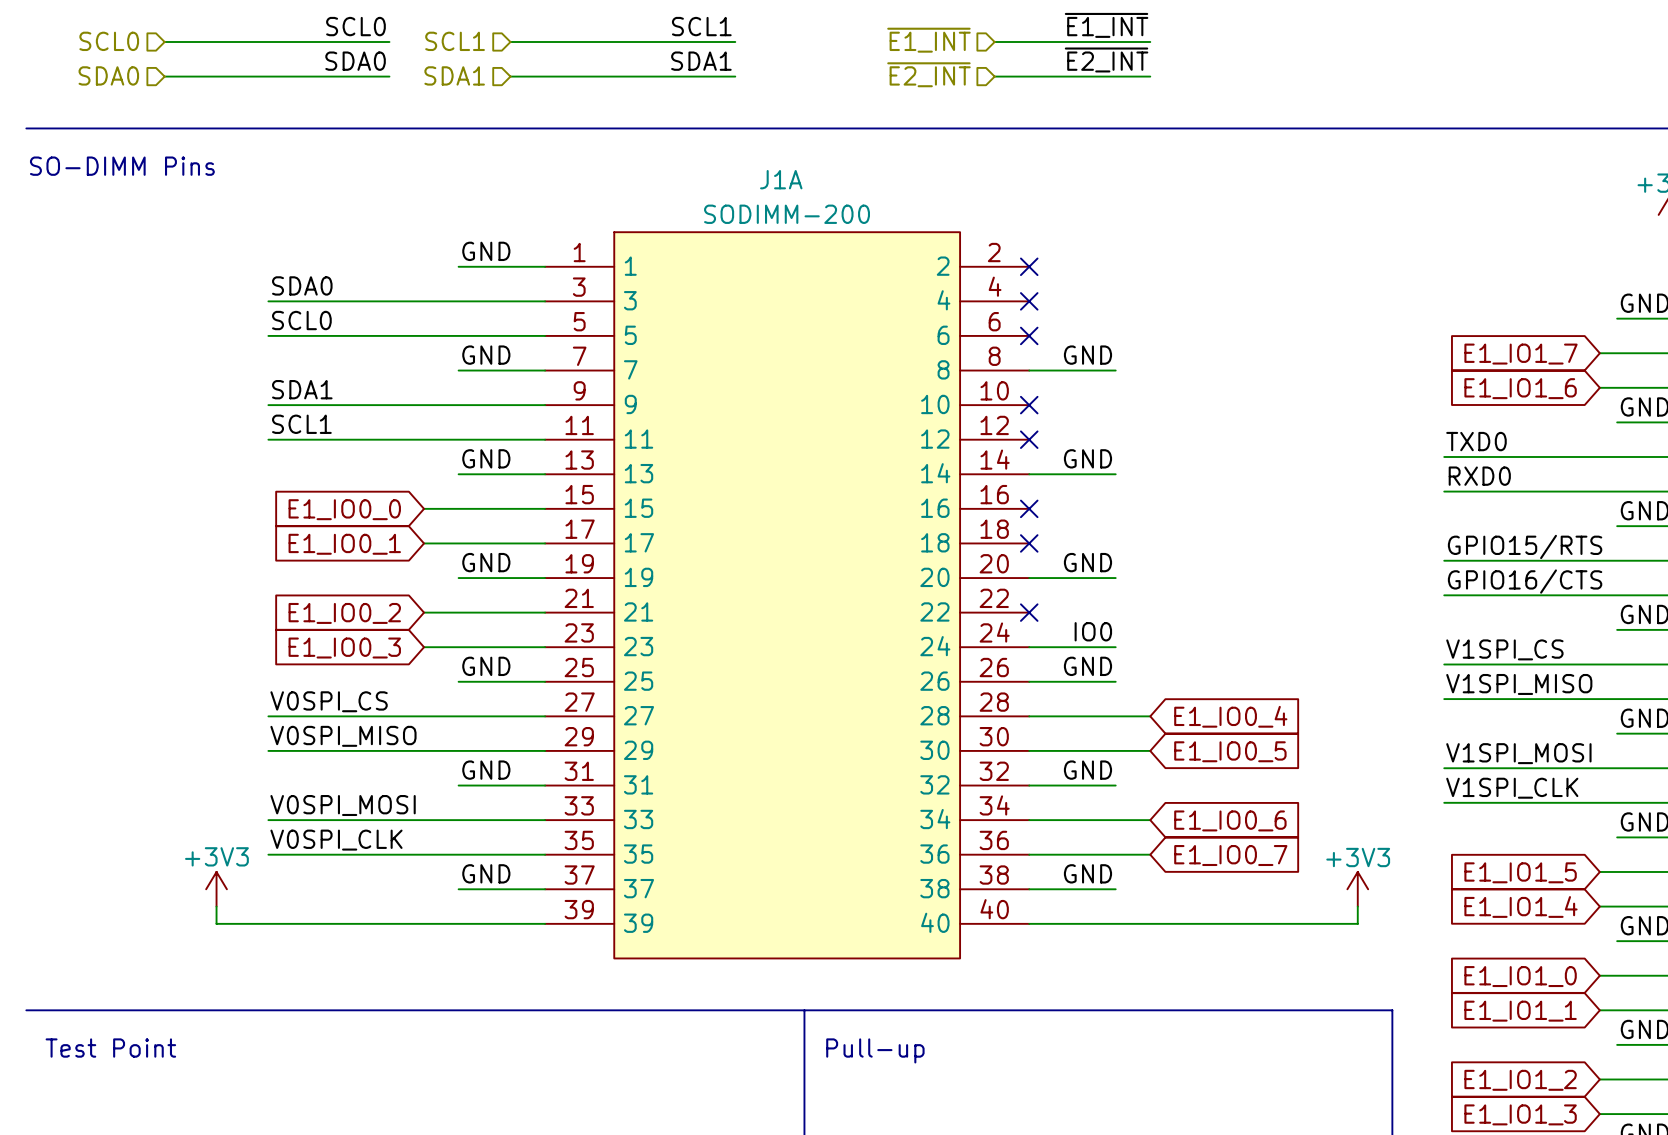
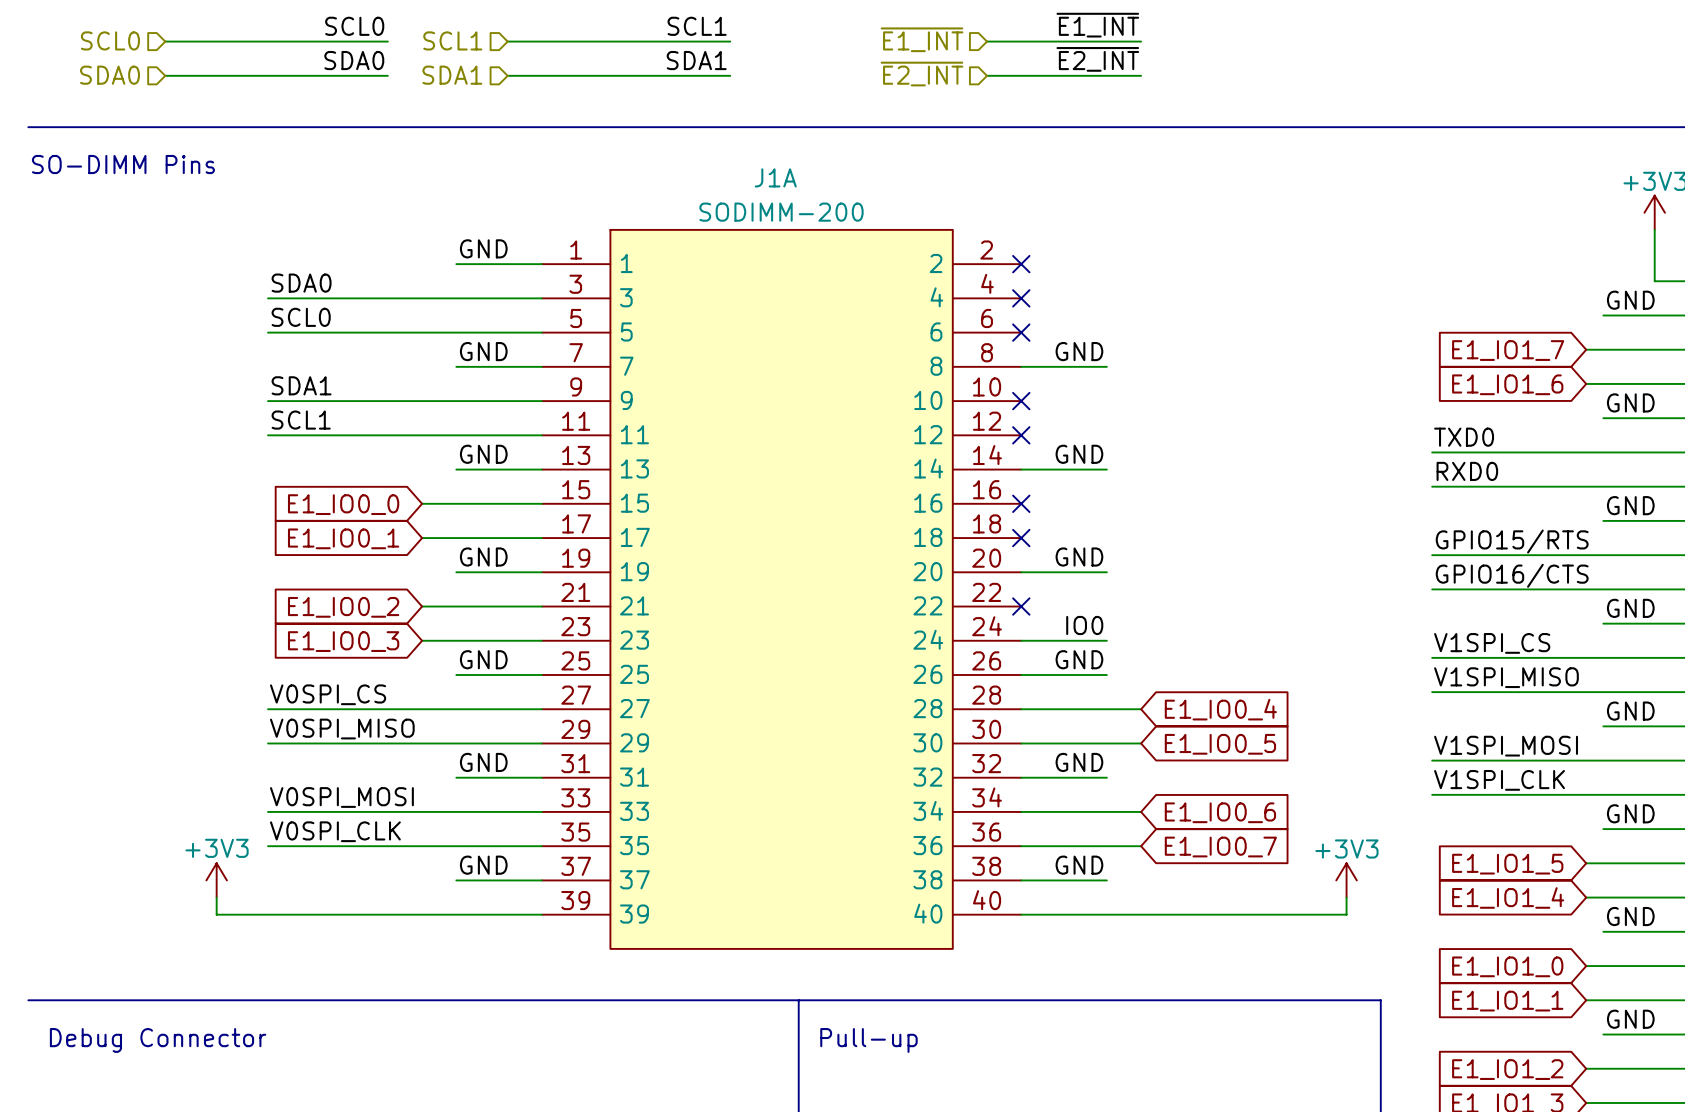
text: Test Point (110, 1048) -> Debug Connector (158, 1040)

